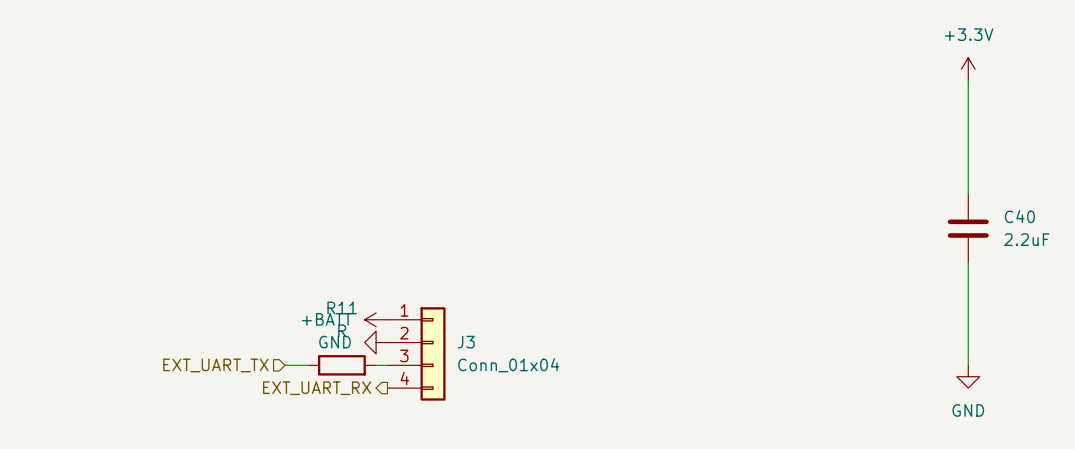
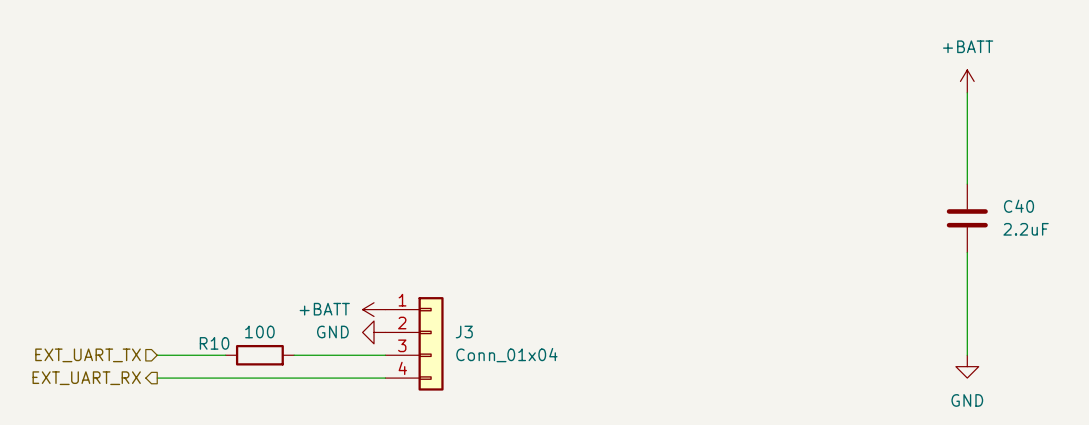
power symbol: +3.3V (968, 69) -> none
power symbol: none -> +BATT (967, 81)
wire: none -> (157, 355) (225, 355)
hierarchical label position: EXT_UART_TX (215, 365) -> EXT_UART_TX (88, 355)
R10: none -> 100 (259, 355)
wire: none -> (305, 355) (374, 355)
R11: R (341, 365) -> none
hierarchical label: none -> EXT_UART_RX (86, 378)
wire: none -> (157, 378) (385, 378)
hierarchical label: EXT_UART_RX (317, 388) -> none

